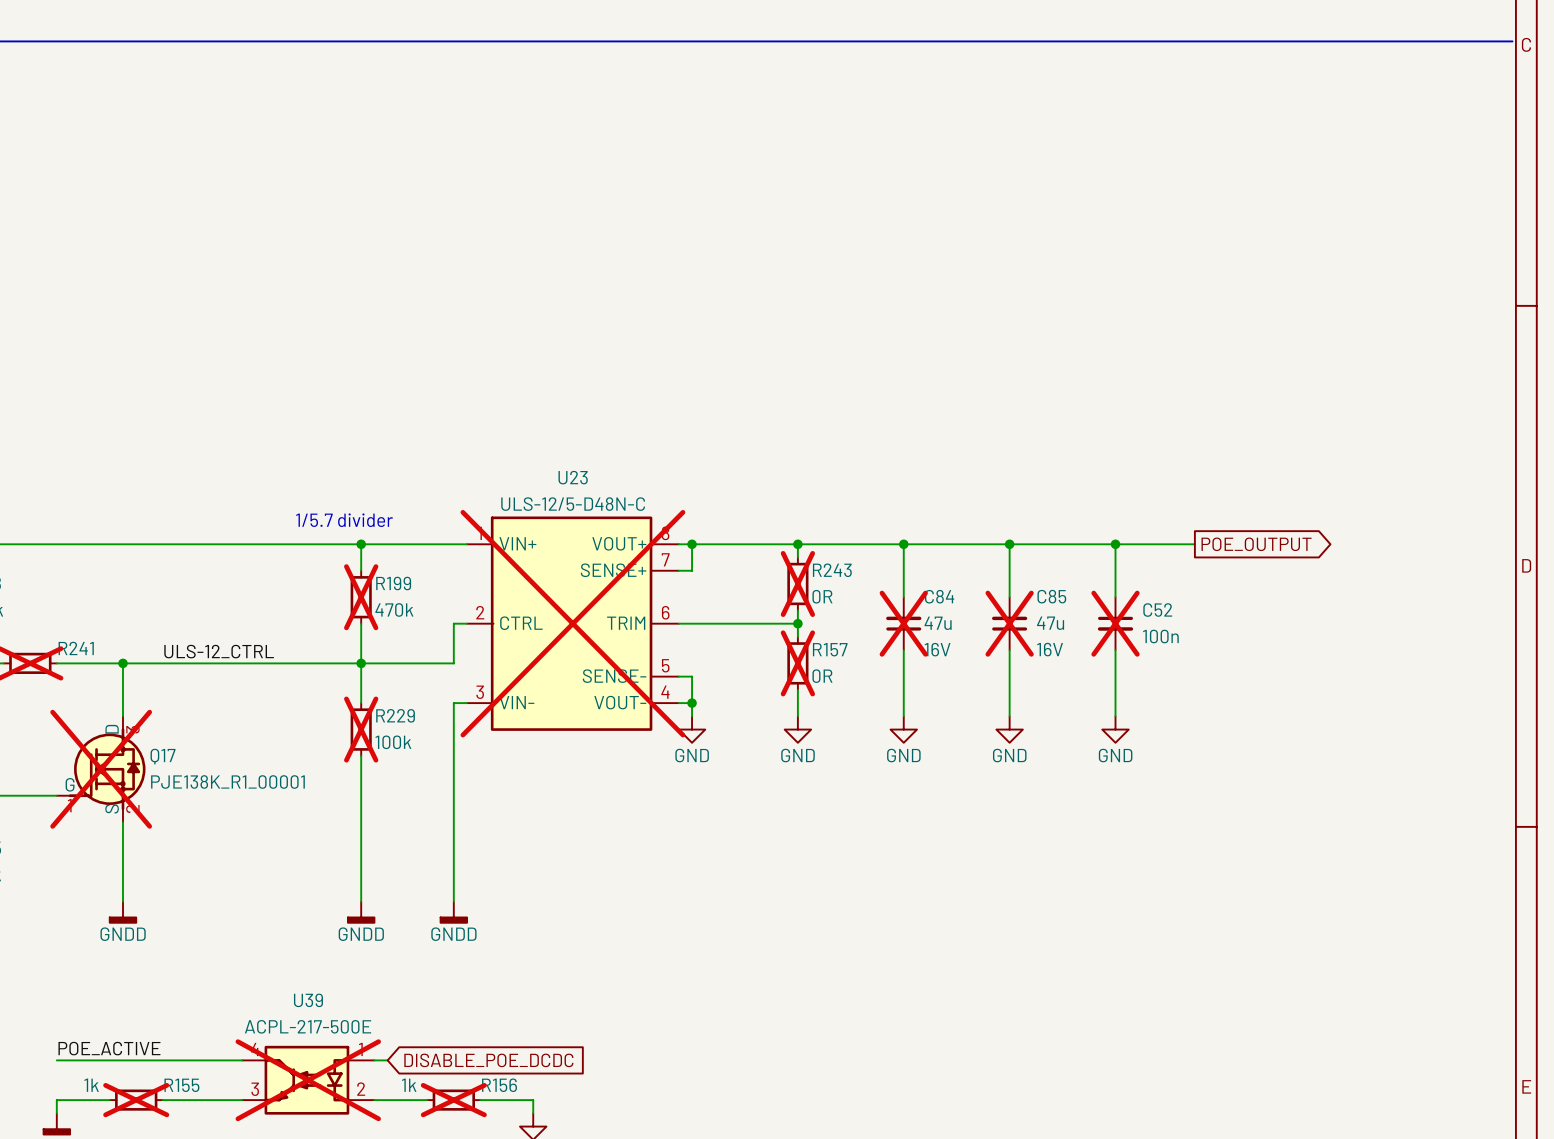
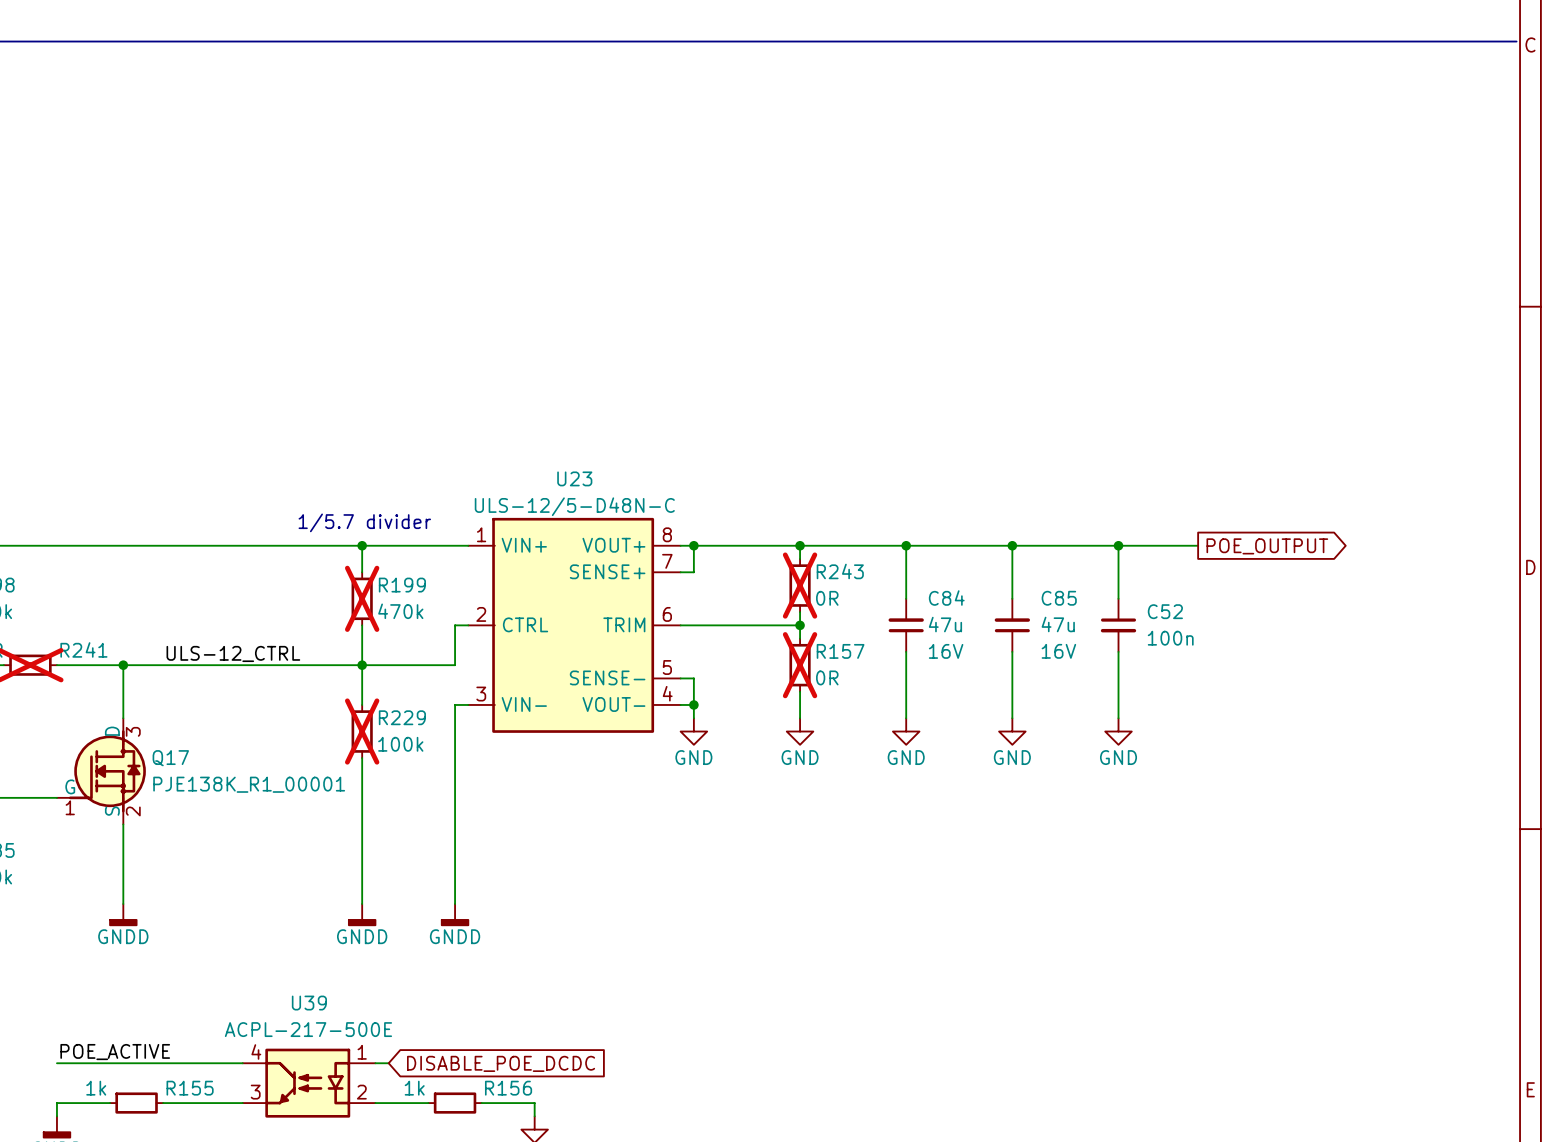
U23 do-not-place cross: (572, 623) -> none
C84 do-not-place cross: (903, 623) -> none
C85 do-not-place cross: (1009, 623) -> none
C52 do-not-place cross: (1115, 623) -> none
Q17 do-not-place cross: (101, 769) -> none
U39 do-not-place cross: (308, 1080) -> none
R155 do-not-place cross: (136, 1100) -> none
R156 do-not-place cross: (453, 1100) -> none

